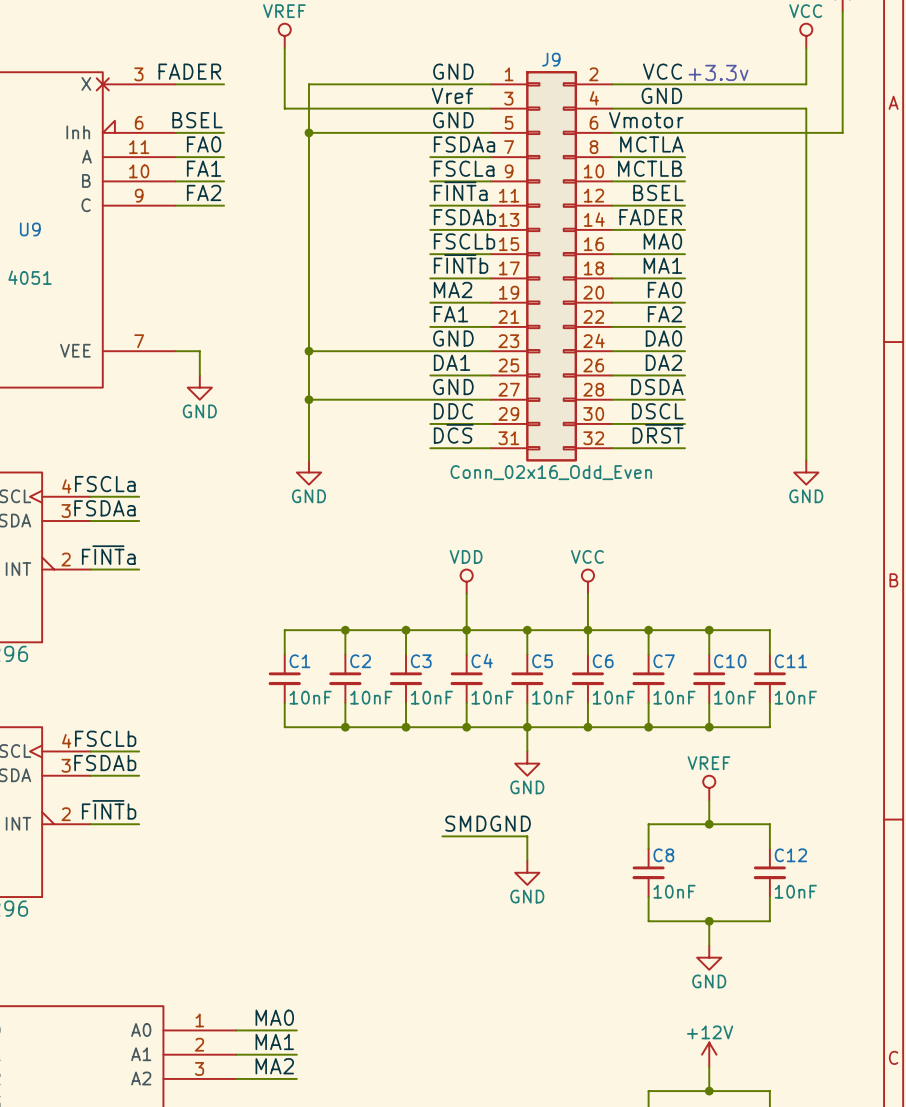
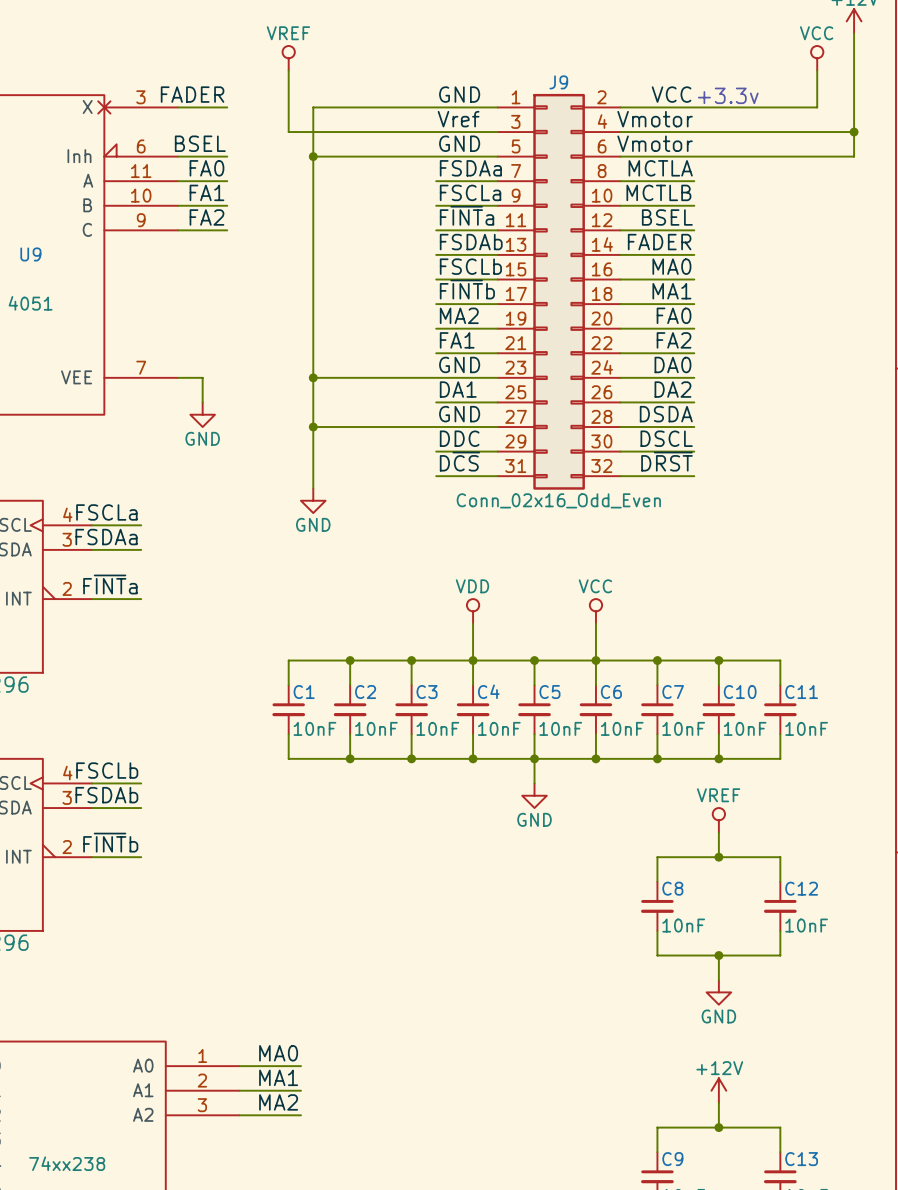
label: GND (661, 95) -> Vmotor (655, 119)
wire: (806, 108) (806, 460) -> (817, 132) (854, 132)
junction: none -> (854, 132)
power symbol: GND (806, 472) -> none
label: SMDGND (488, 823) -> none
wire: (442, 836) (527, 836) (527, 860) -> none
power symbol: GND (527, 872) -> none

